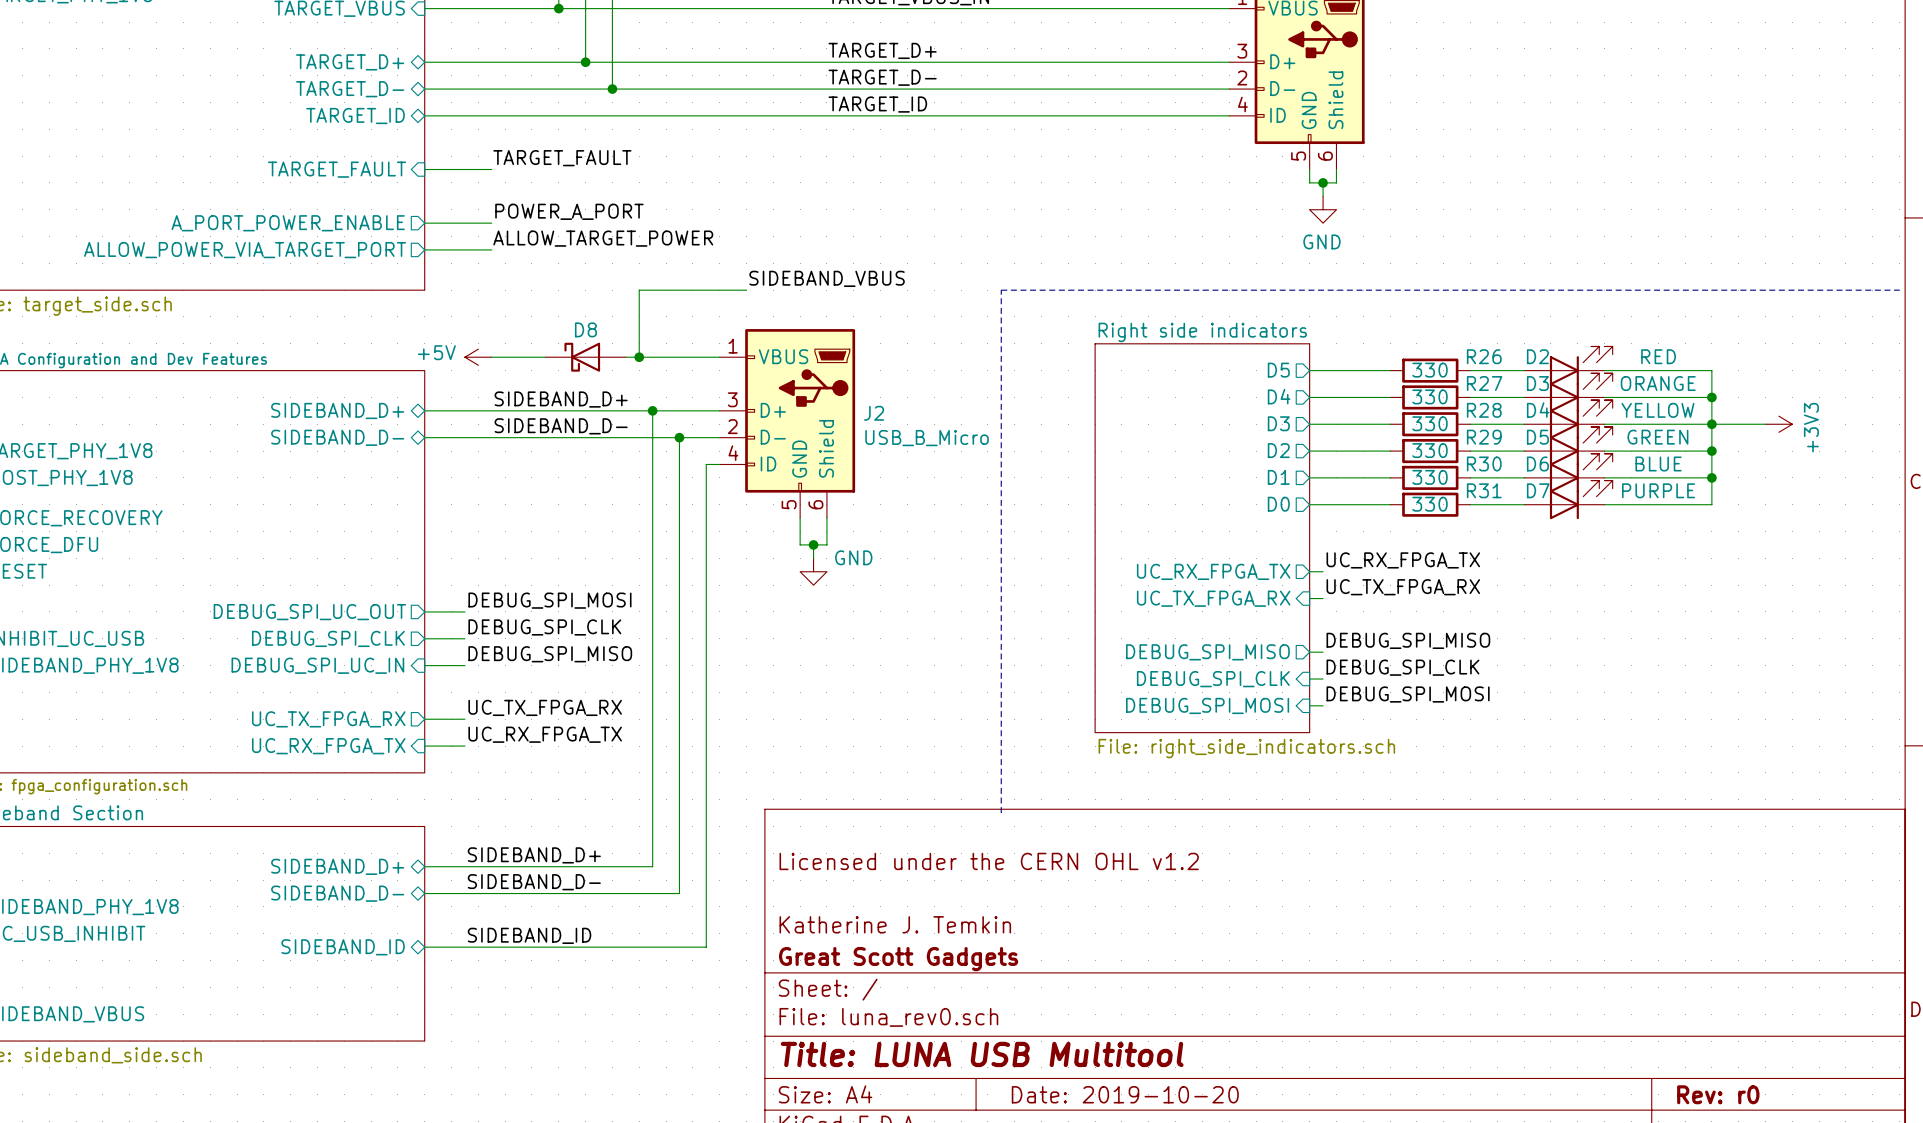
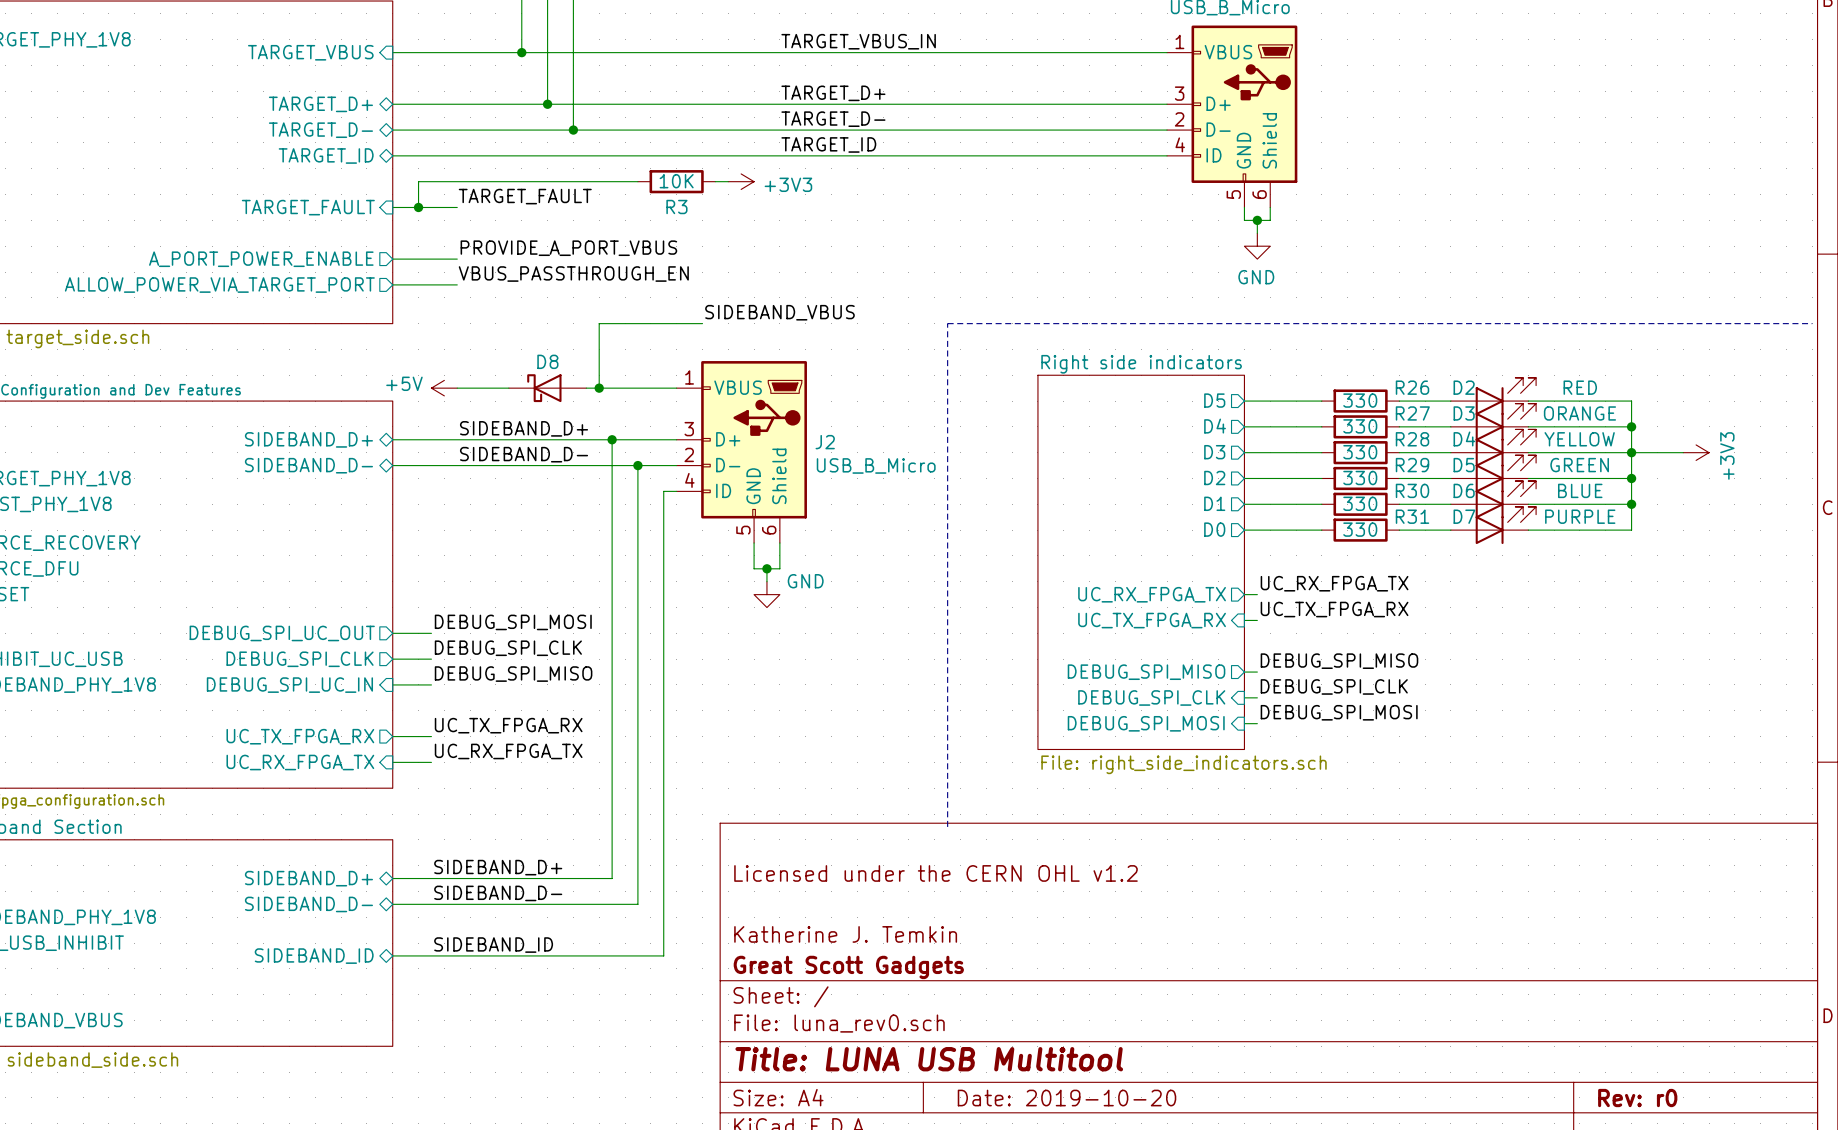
wire: none -> (637, 181) (418, 181) (418, 207)
R3: none -> 10K (676, 181)
wire: none -> (715, 181) (728, 181)
power symbol: none -> +3V3 (741, 181)
junction: none -> (418, 207)
label: POWER_A_PORT (569, 211) -> PROVIDE_A_PORT_VBUS (568, 248)
label: ALLOW_TARGET_POWER (603, 238) -> VBUS_PASSTHROUGH_EN (573, 274)

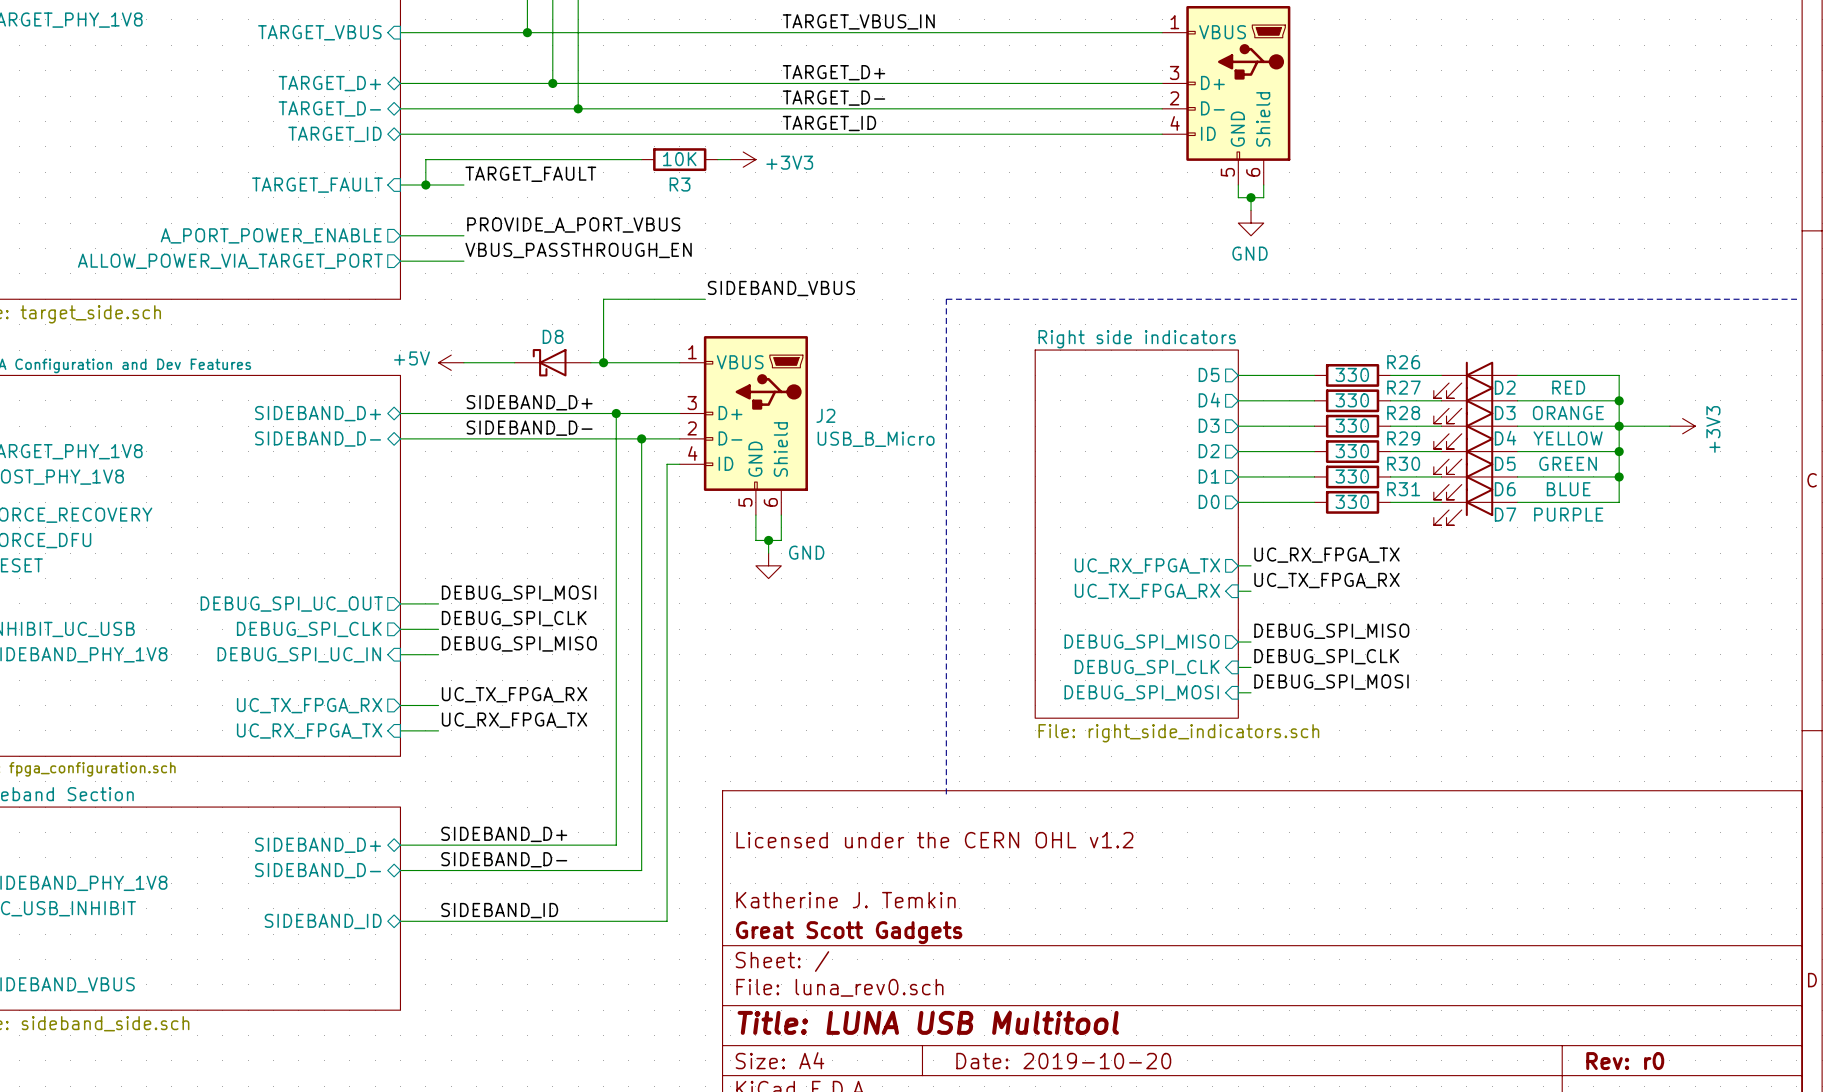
D2 rotation: 0° (1505, 396) -> 180° (1463, 379)
D3 rotation: 0° (1505, 422) -> 180° (1463, 405)
D4 rotation: 0° (1505, 448) -> 180° (1463, 430)
D5 rotation: 0° (1505, 473) -> 180° (1463, 456)
D6 rotation: 0° (1505, 499) -> 180° (1463, 481)
D7 rotation: 0° (1505, 525) -> 180° (1463, 506)

